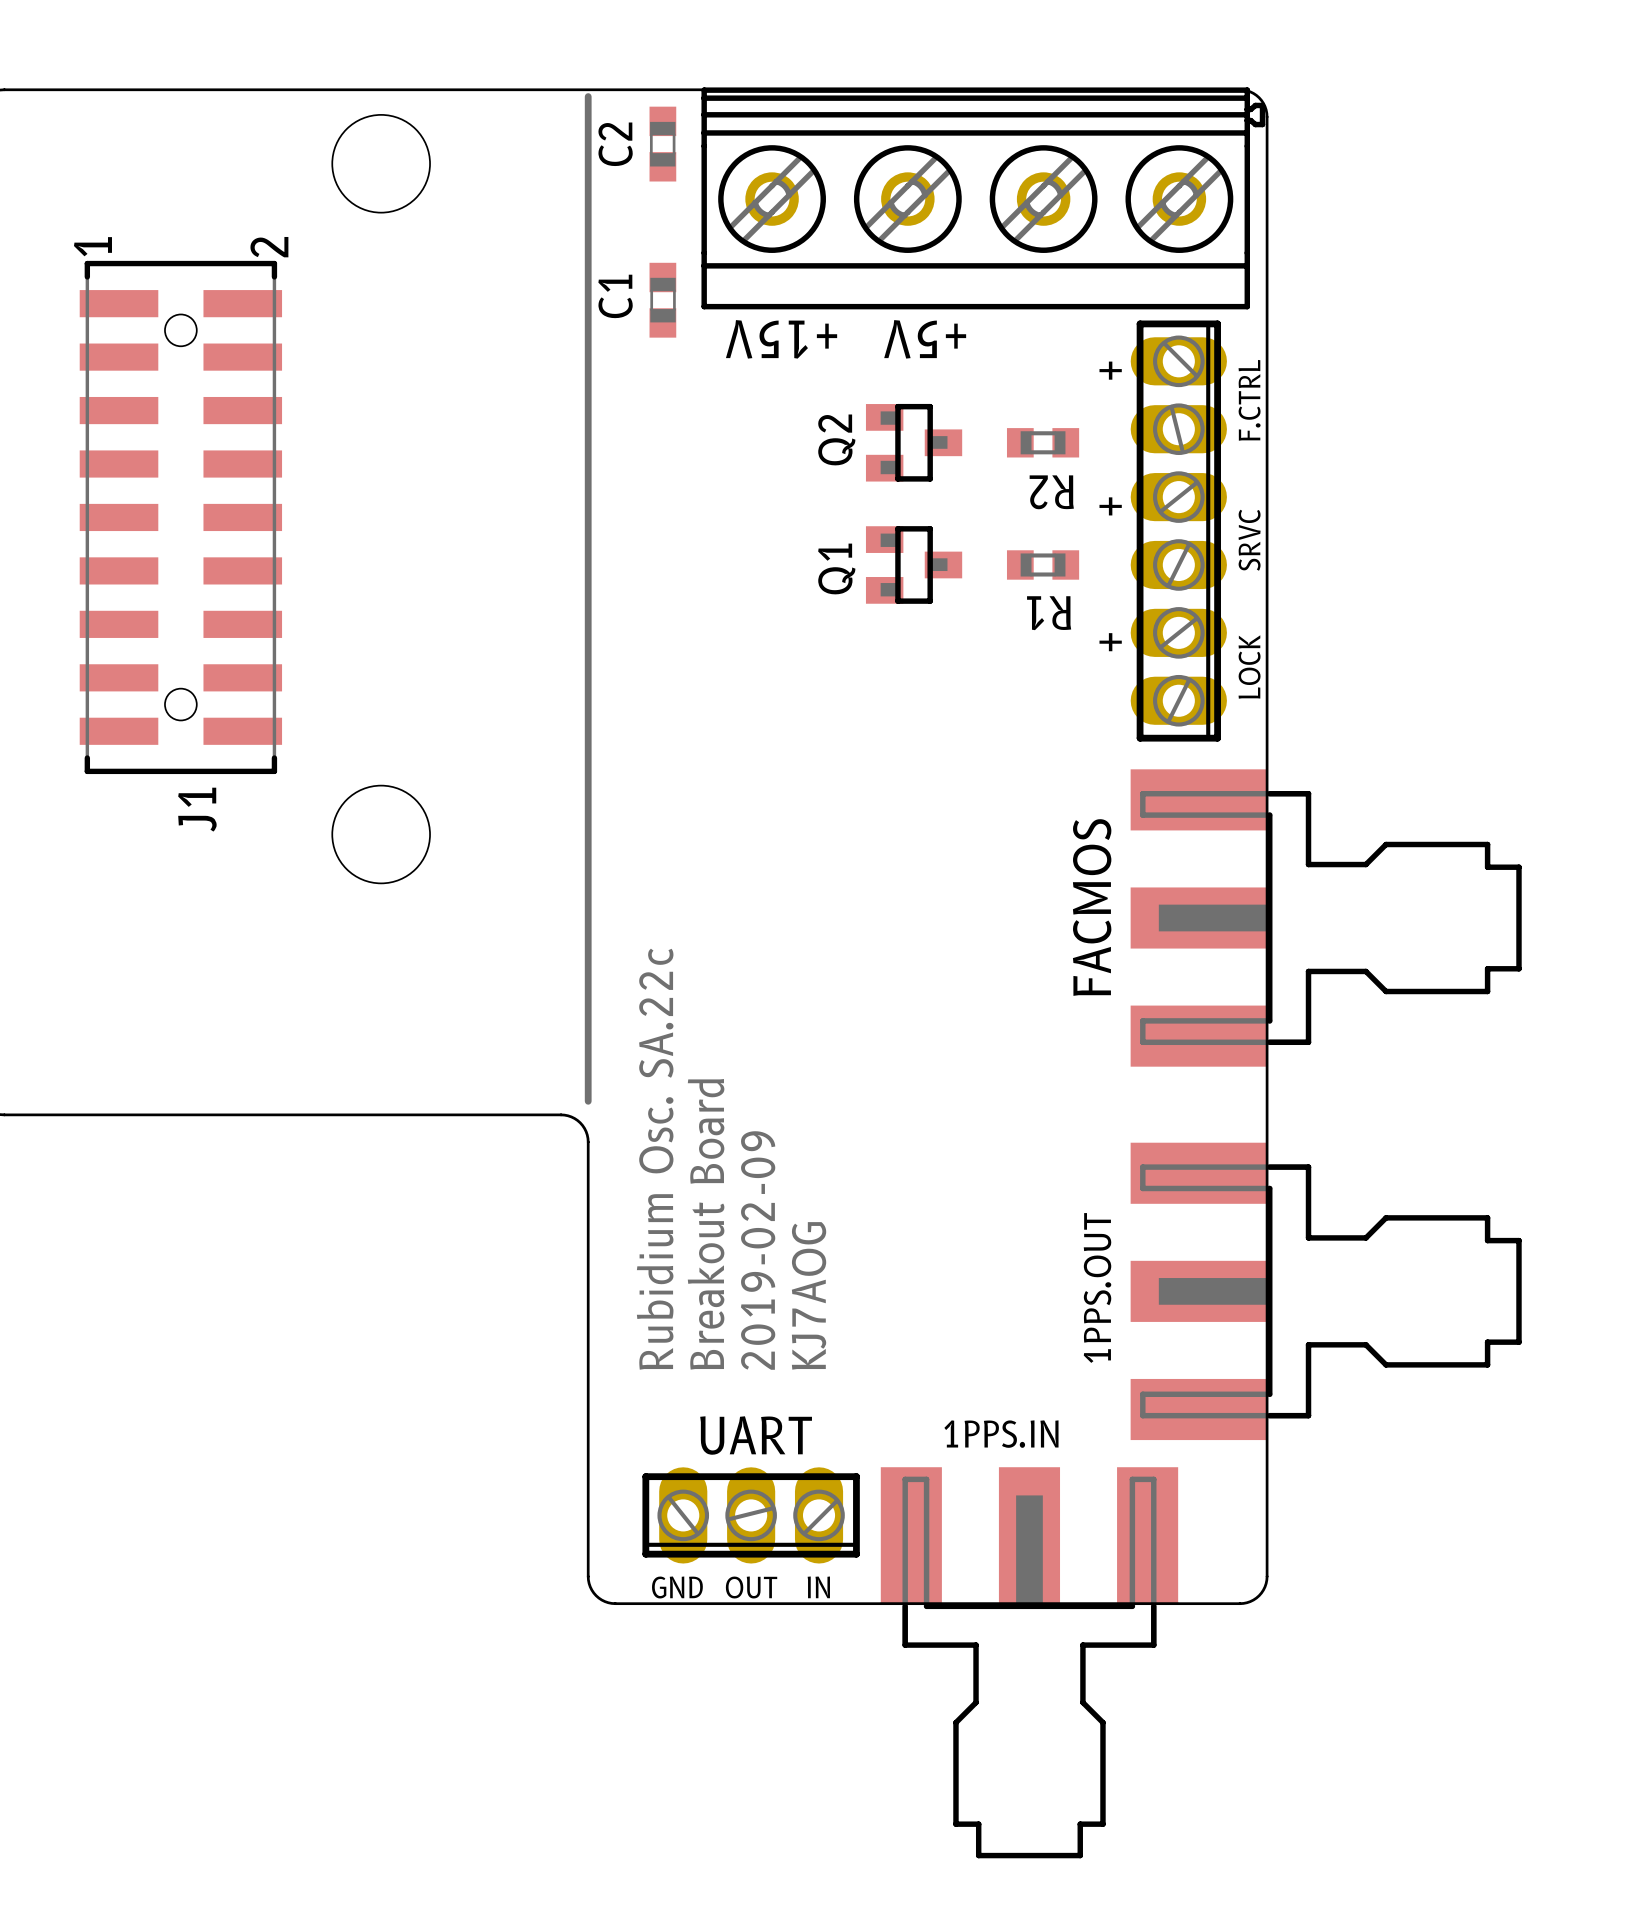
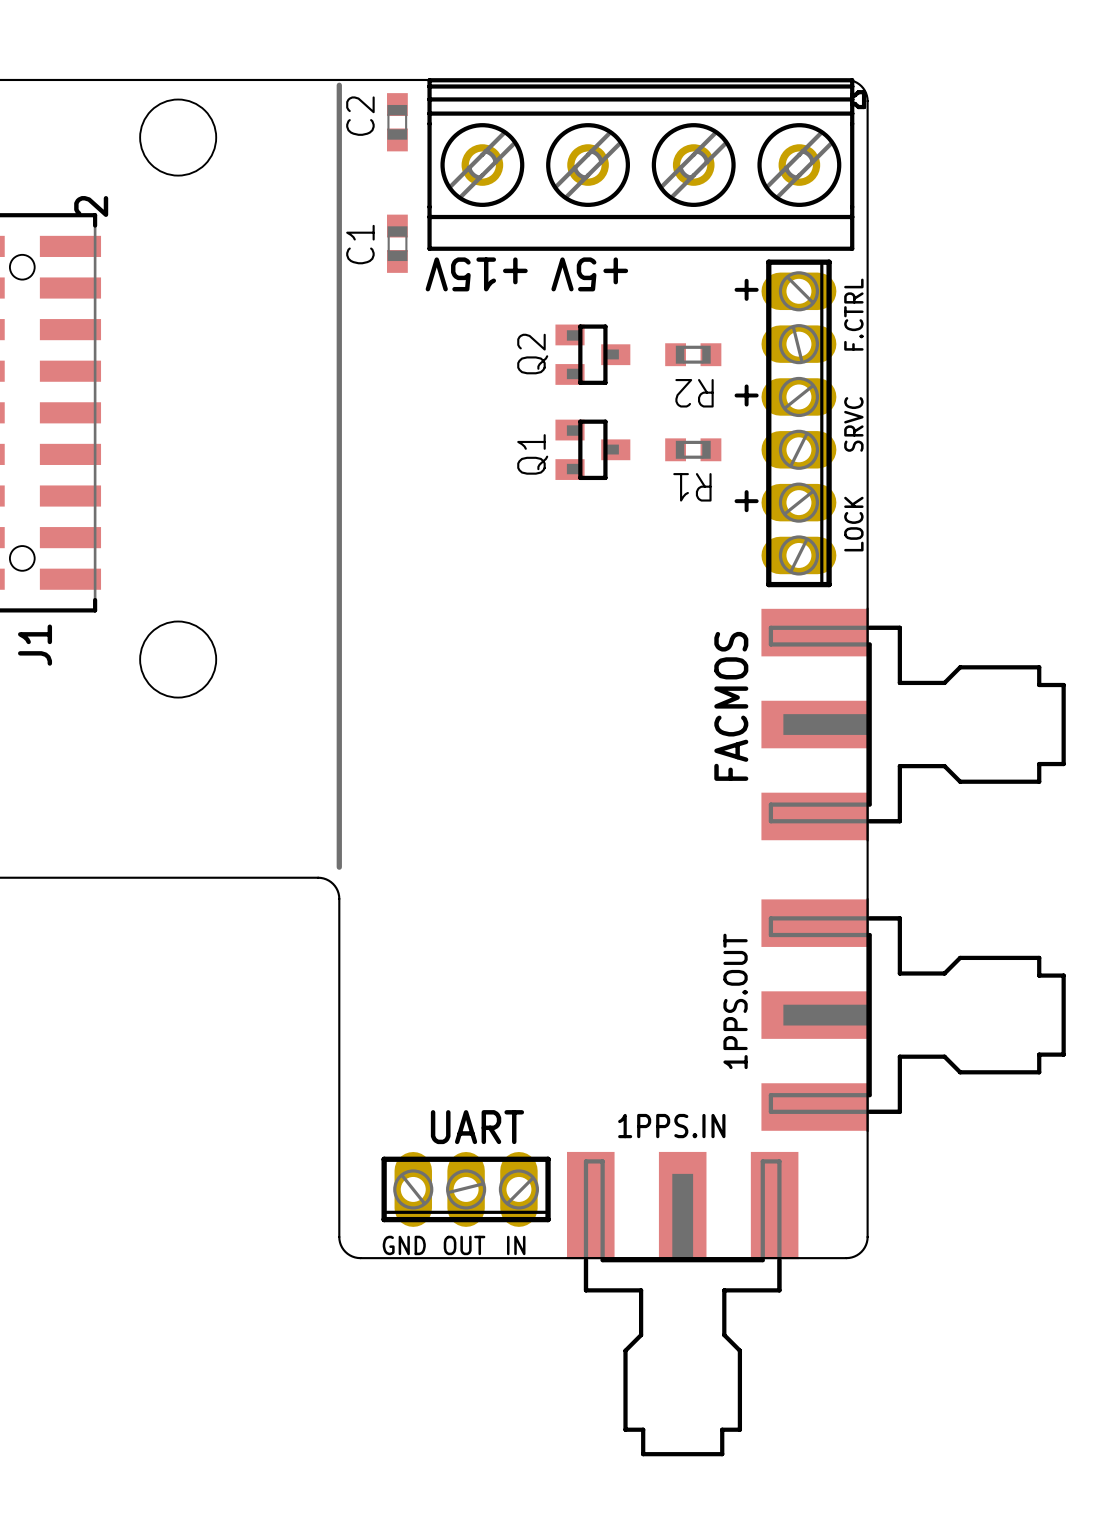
text: Rubidium Osc. SA.22c (655, 1159) -> none
text: Breakout Board (706, 1224) -> none
text: 2019-02-09 (758, 1250) -> none
text: KJ7AOG (809, 1295) -> none

